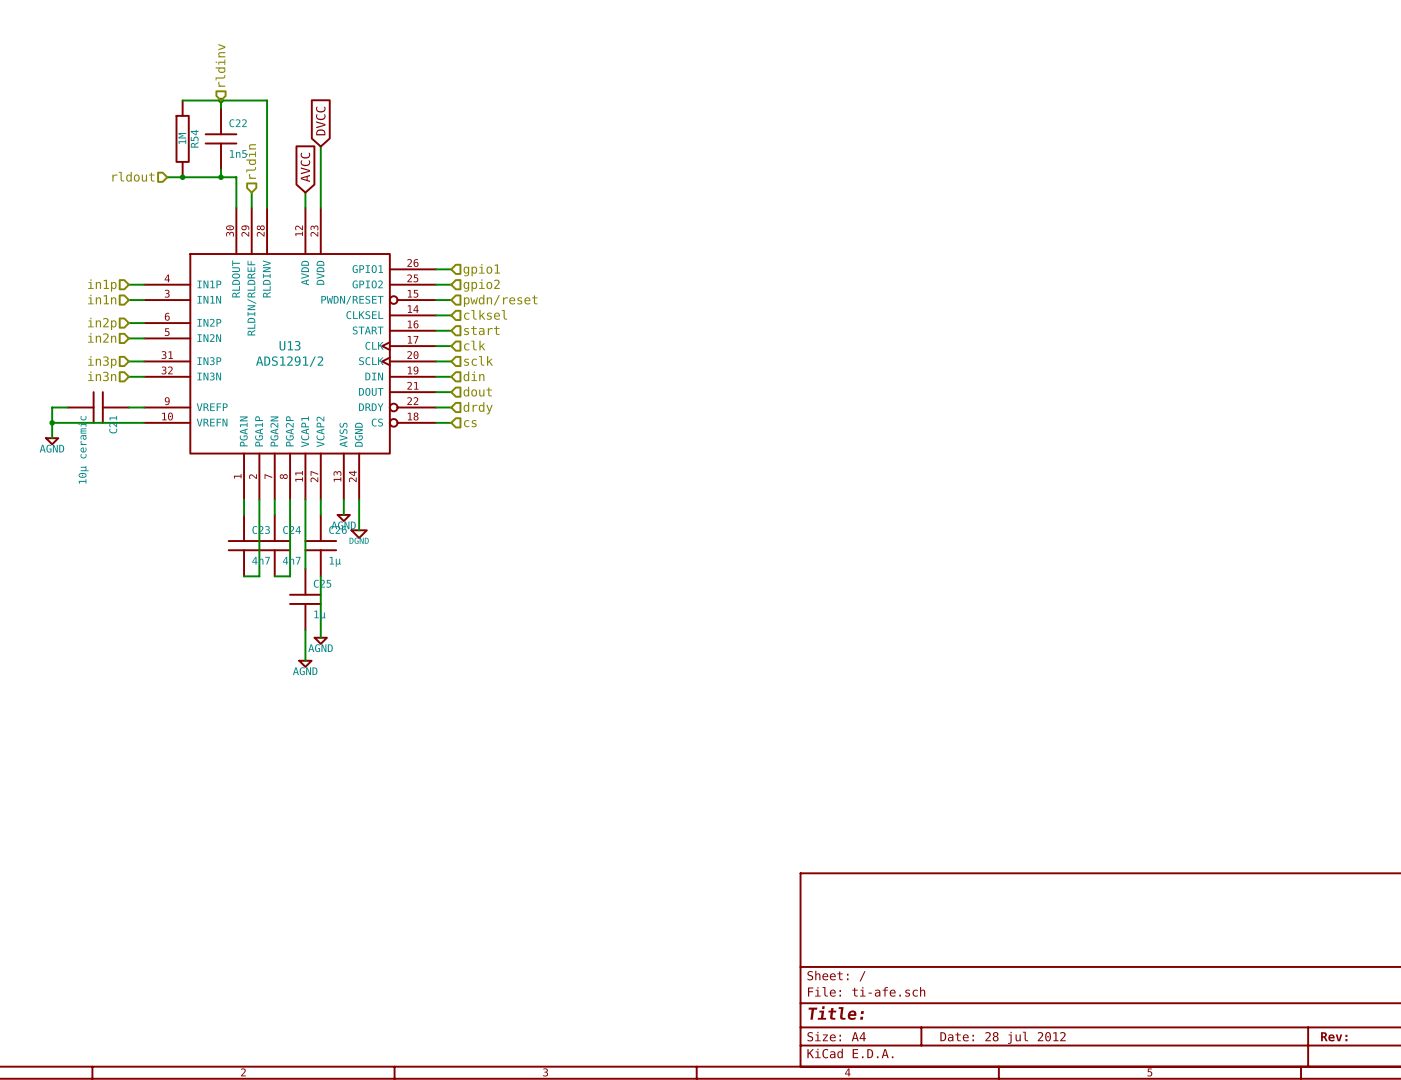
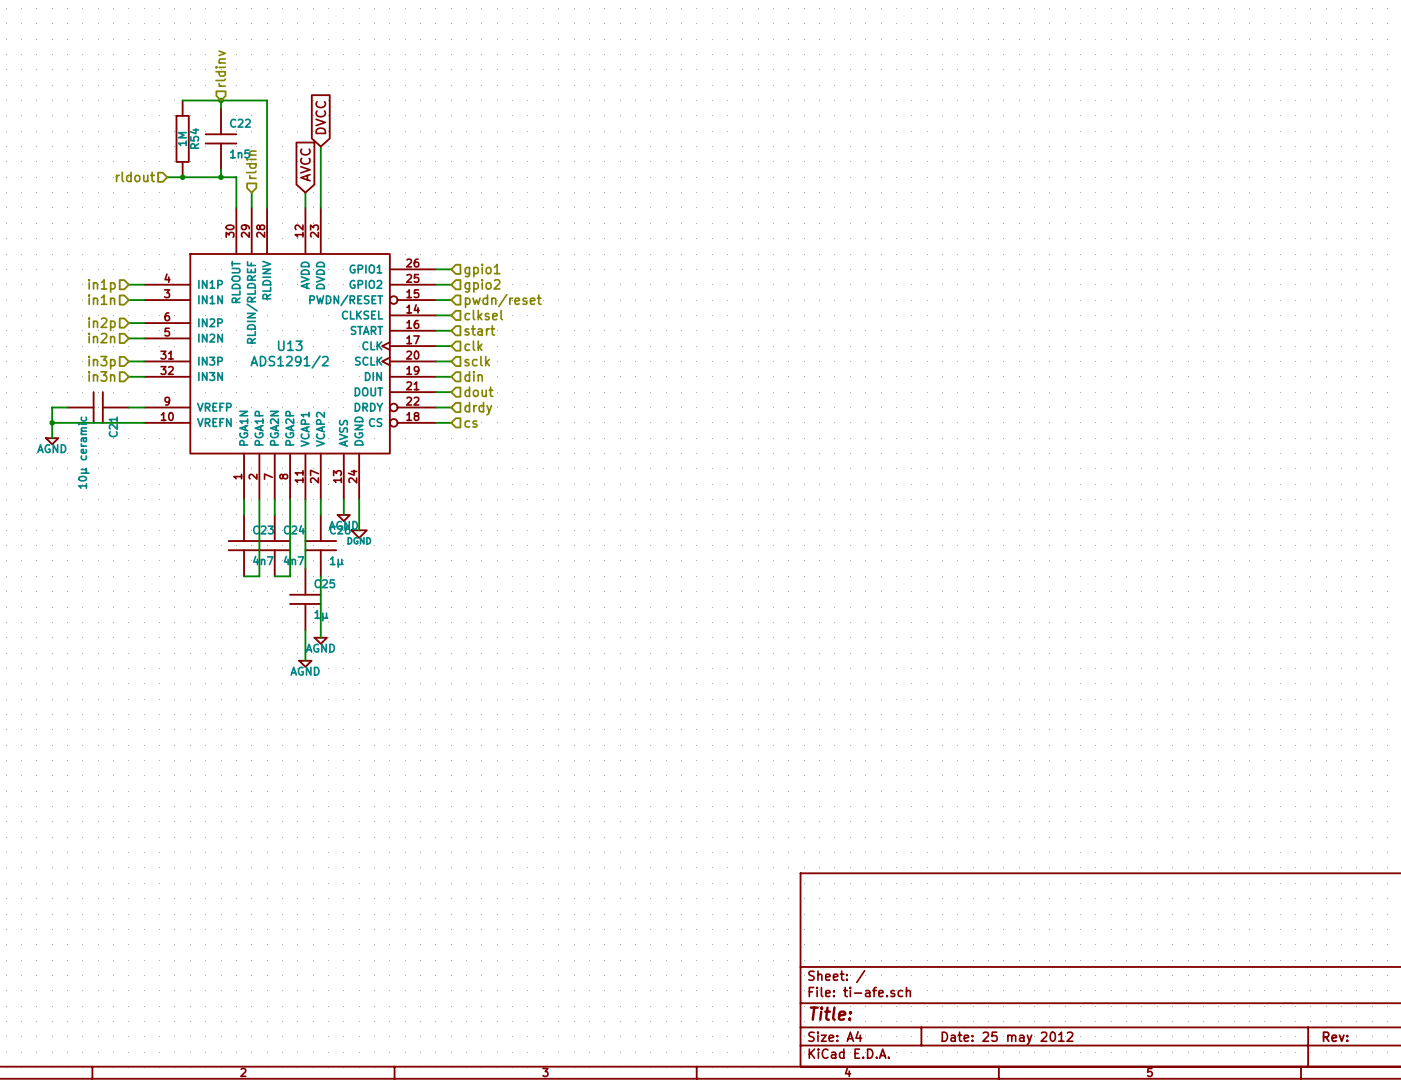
title block: Date: 28 jul 2012 (1003, 1037) -> Date: 25 may 2012 (1007, 1038)

